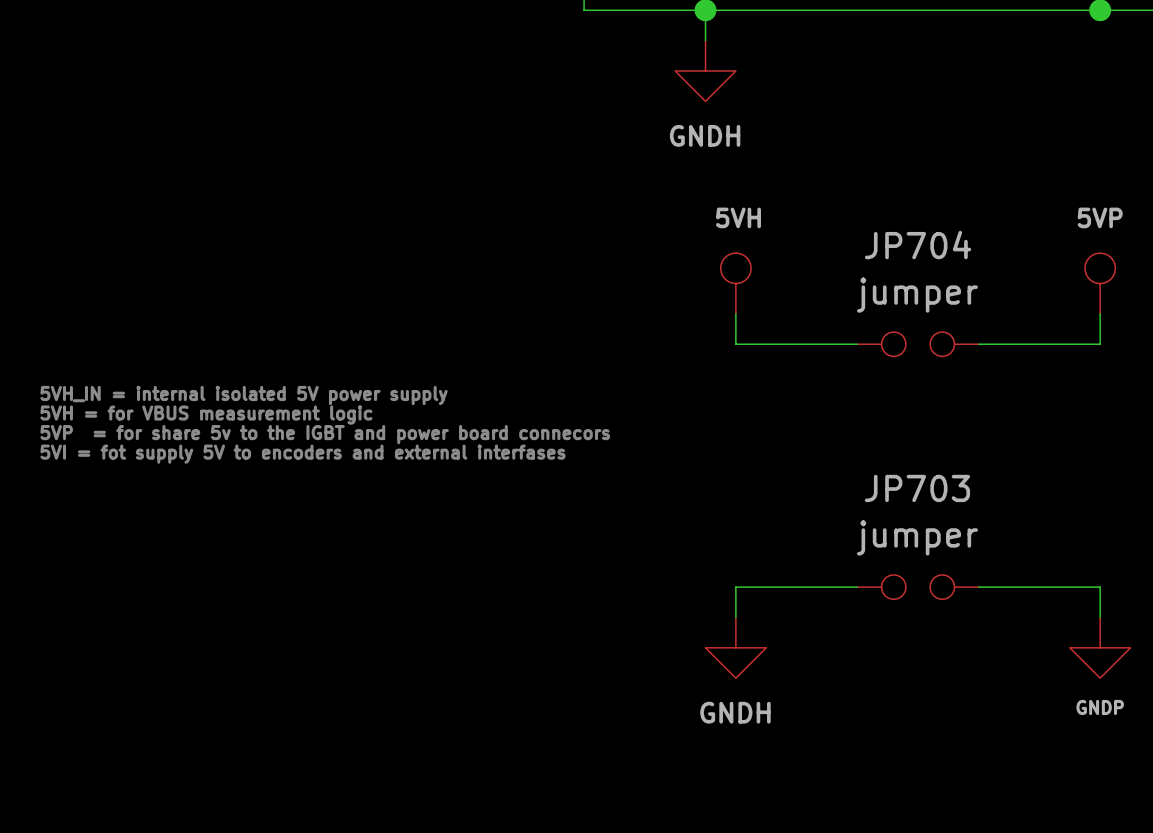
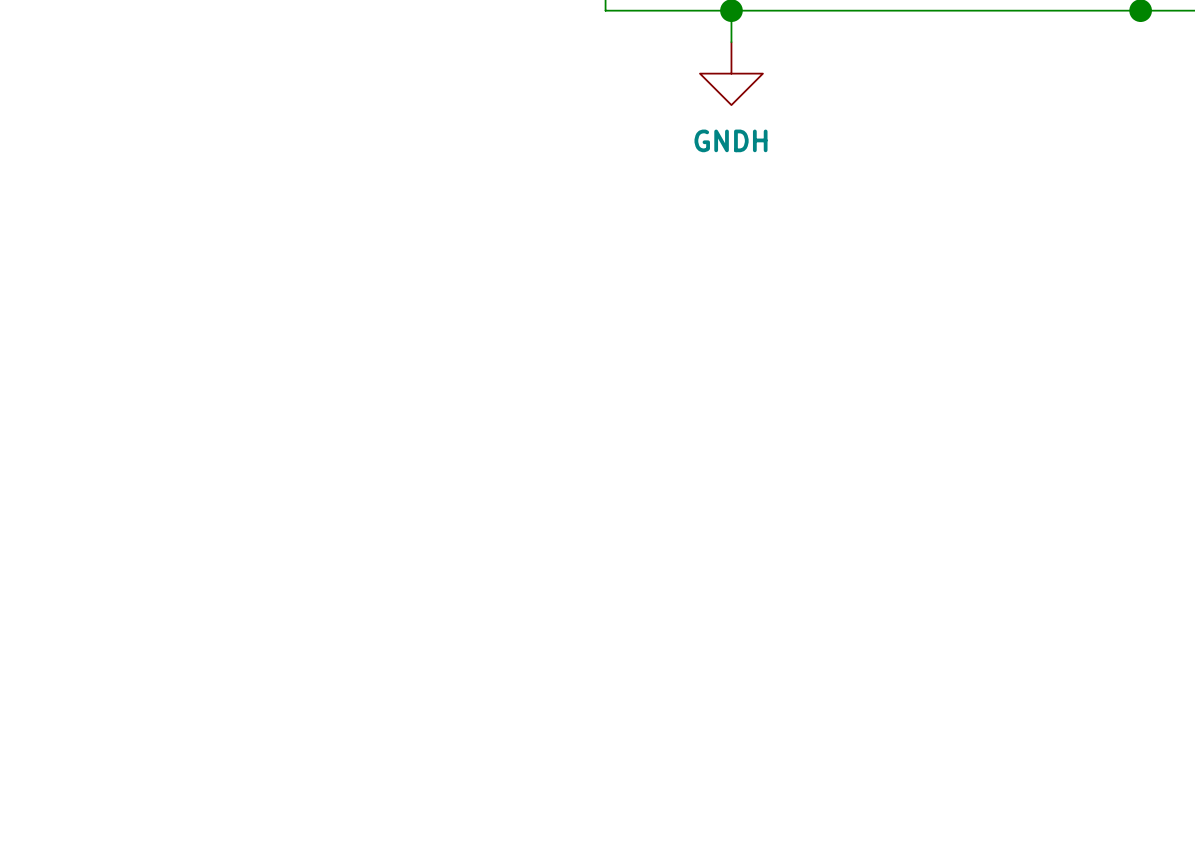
power symbol: 5VH (735, 283) -> none
power symbol: 5VP (1100, 283) -> none
wire: (735, 313) (735, 344) (857, 344) -> none
wire: (1100, 313) (1100, 344) (978, 344) -> none
JP704: jumper (918, 344) -> none
text: 5VH_IN = internal isolated 5V power supply (244, 395) -> none
text: 5VH = for VBUS measurement logic (206, 415) -> none
text: 5VP = for share 5v to the IGBT and power board connecors (325, 434) -> none
text: 5VI = fot supply 5V to encoders and external interfases (303, 454) -> none
wire: (857, 587) (735, 587) (735, 617) -> none
JP703: jumper (918, 587) -> none
wire: (978, 587) (1100, 587) (1100, 617) -> none
power symbol: GNDH (735, 647) -> none
power symbol: GNDP (1100, 647) -> none

